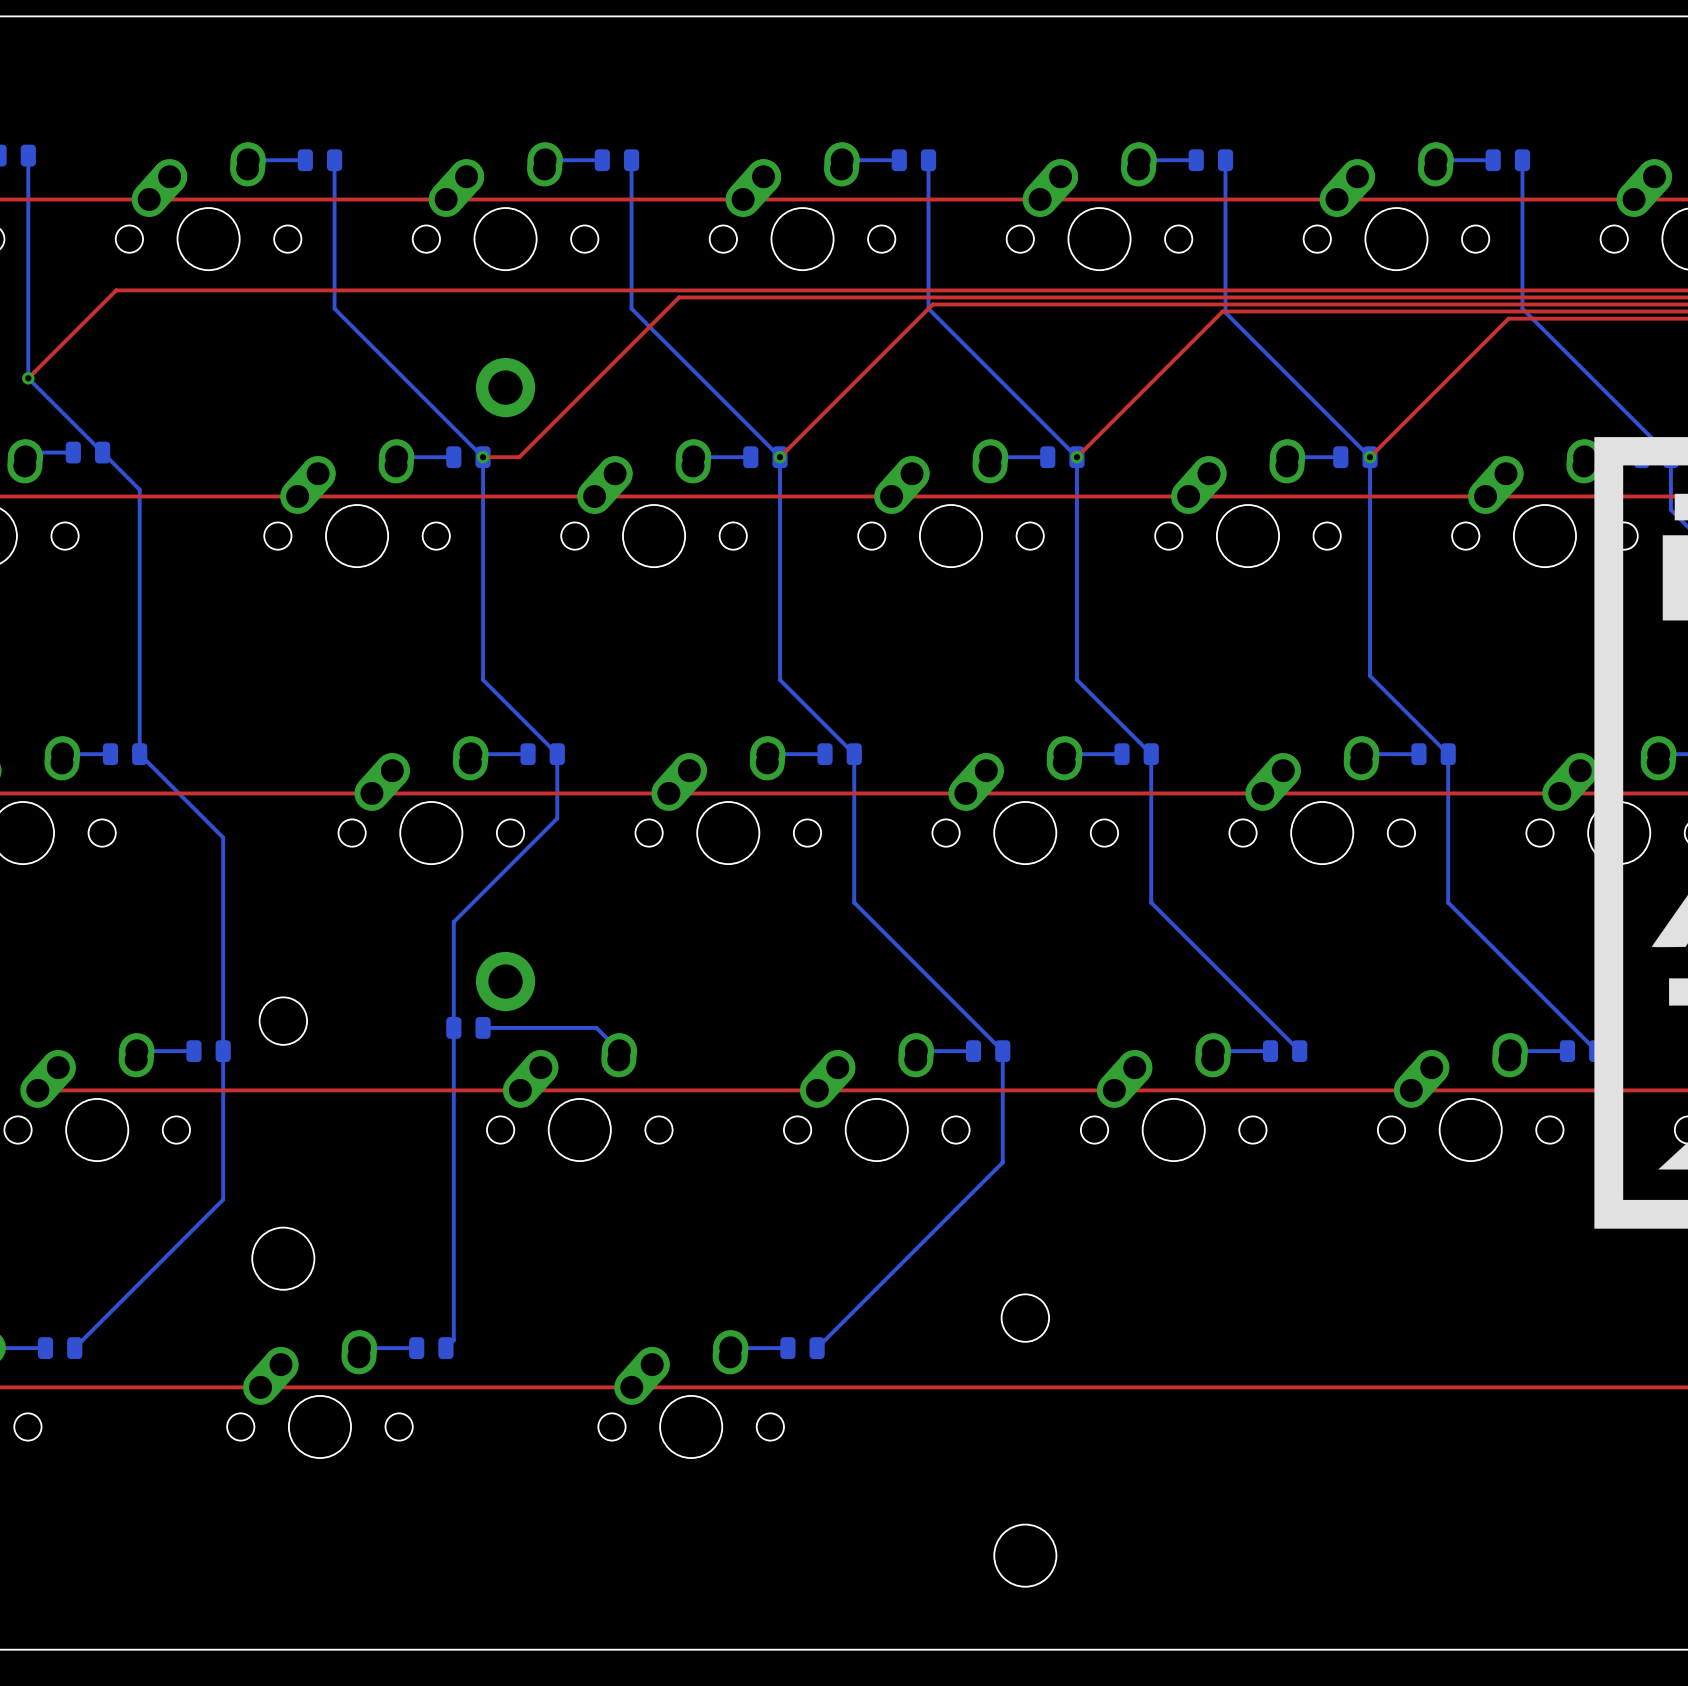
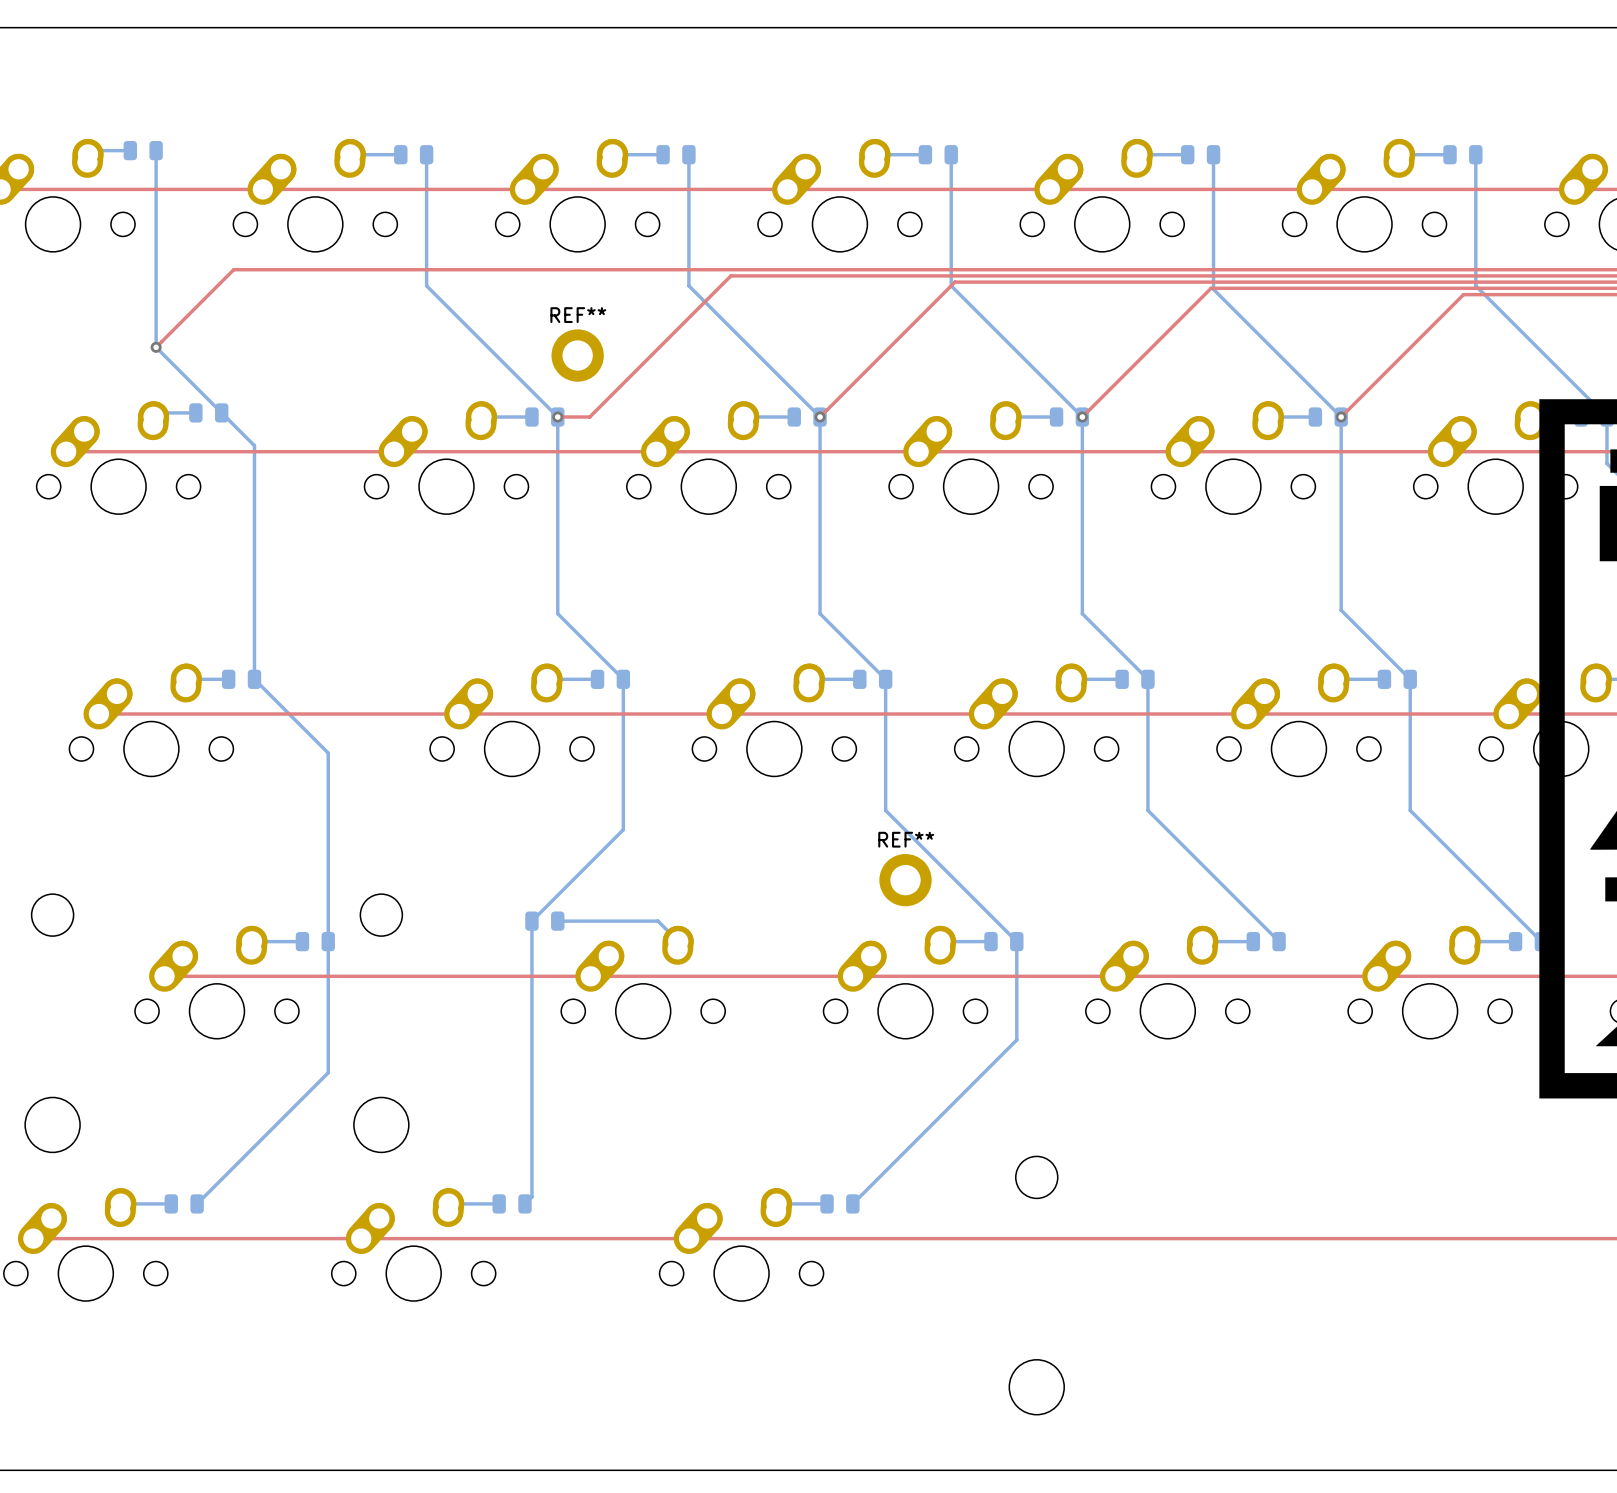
REF** name: none -> REF** (578, 315)
bottom track: (557, 818) (453, 921) (453, 1027) -> (623, 736) (623, 829) (531, 921)
part: (505, 981) -> none
REF**: none -> (905, 880)

